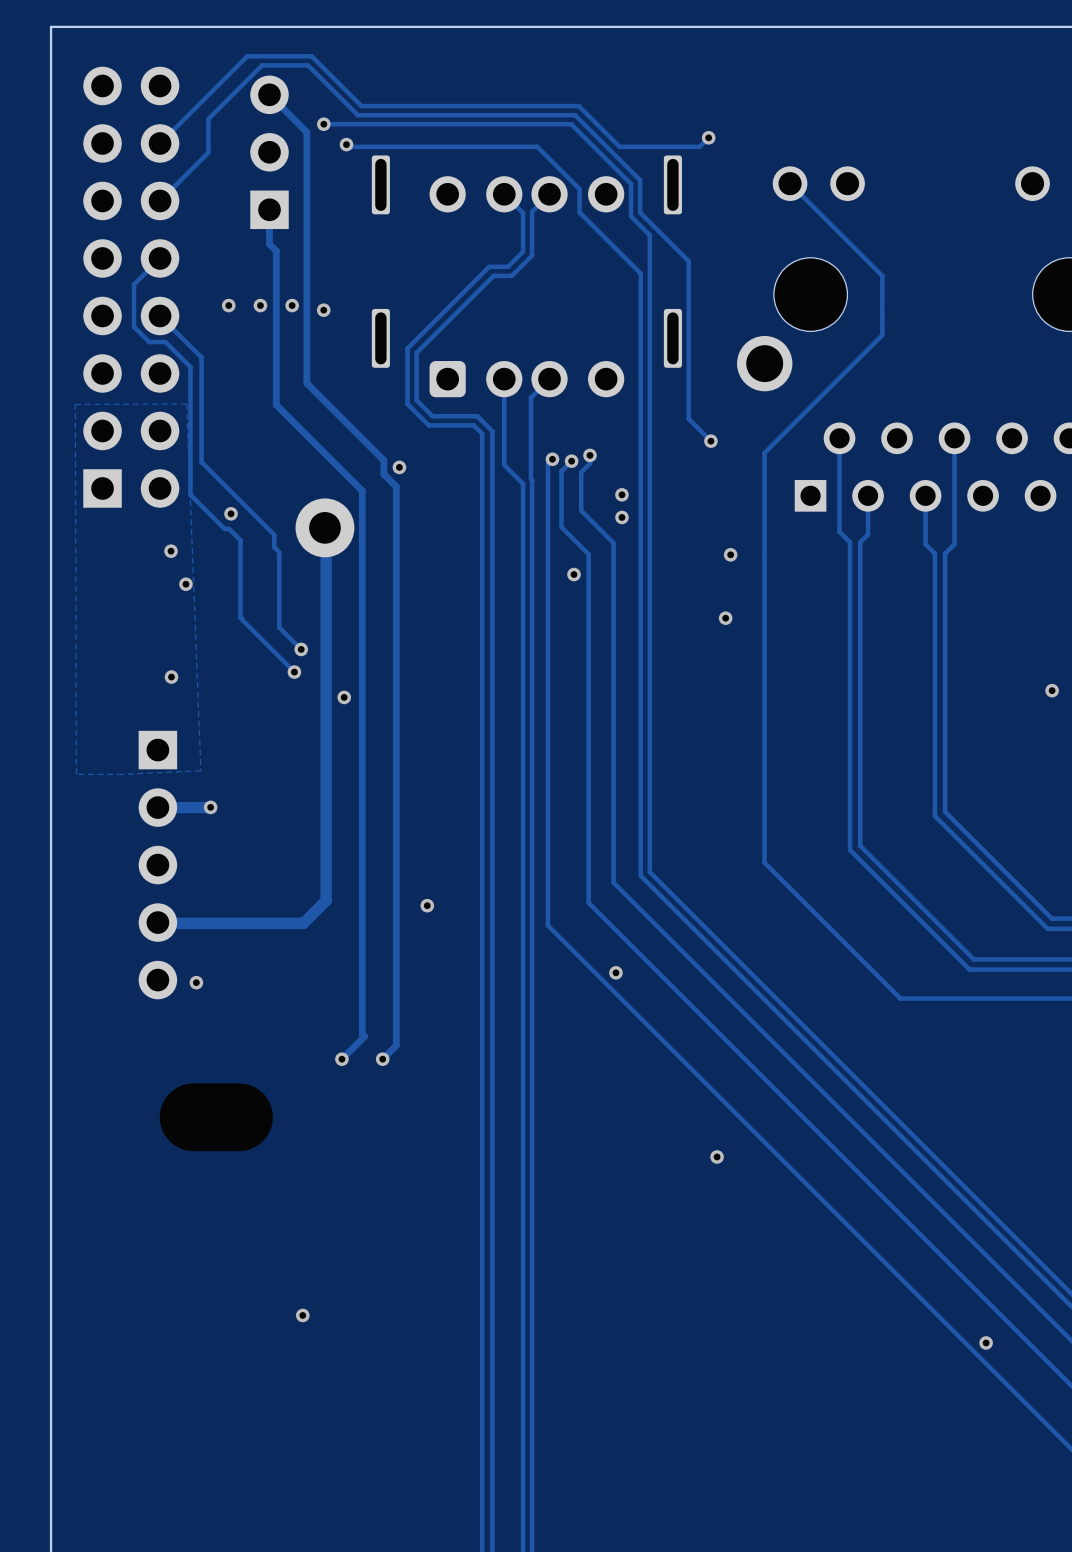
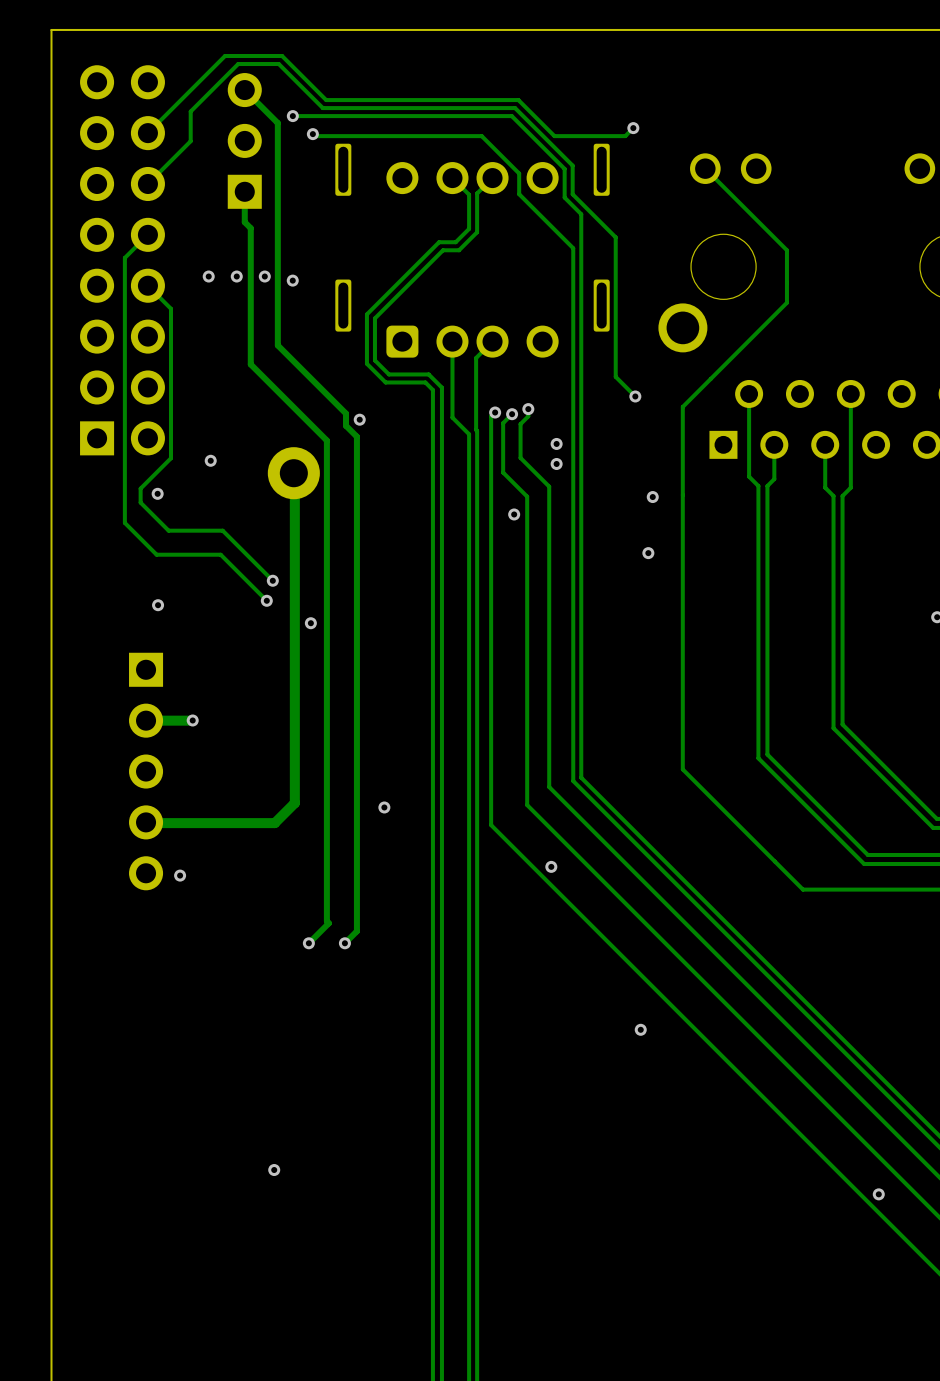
track: (133, 326) (149, 342) (165, 342) (190, 367) (190, 494) (224, 529) (229, 529) (240, 540) (240, 617) (242, 620) -> (124, 295) (124, 522) (156, 554) (220, 554)
track: (186, 342) (201, 357) (201, 462) (274, 534) (274, 547) (279, 552) (279, 627) -> (170, 308) (170, 458) (140, 488) (140, 502) (168, 530) (222, 530) (253, 561)
zone outline: (186, 404) (75, 404) (76, 774) (200, 770) (186, 404) -> none
via: (185, 584) -> none

